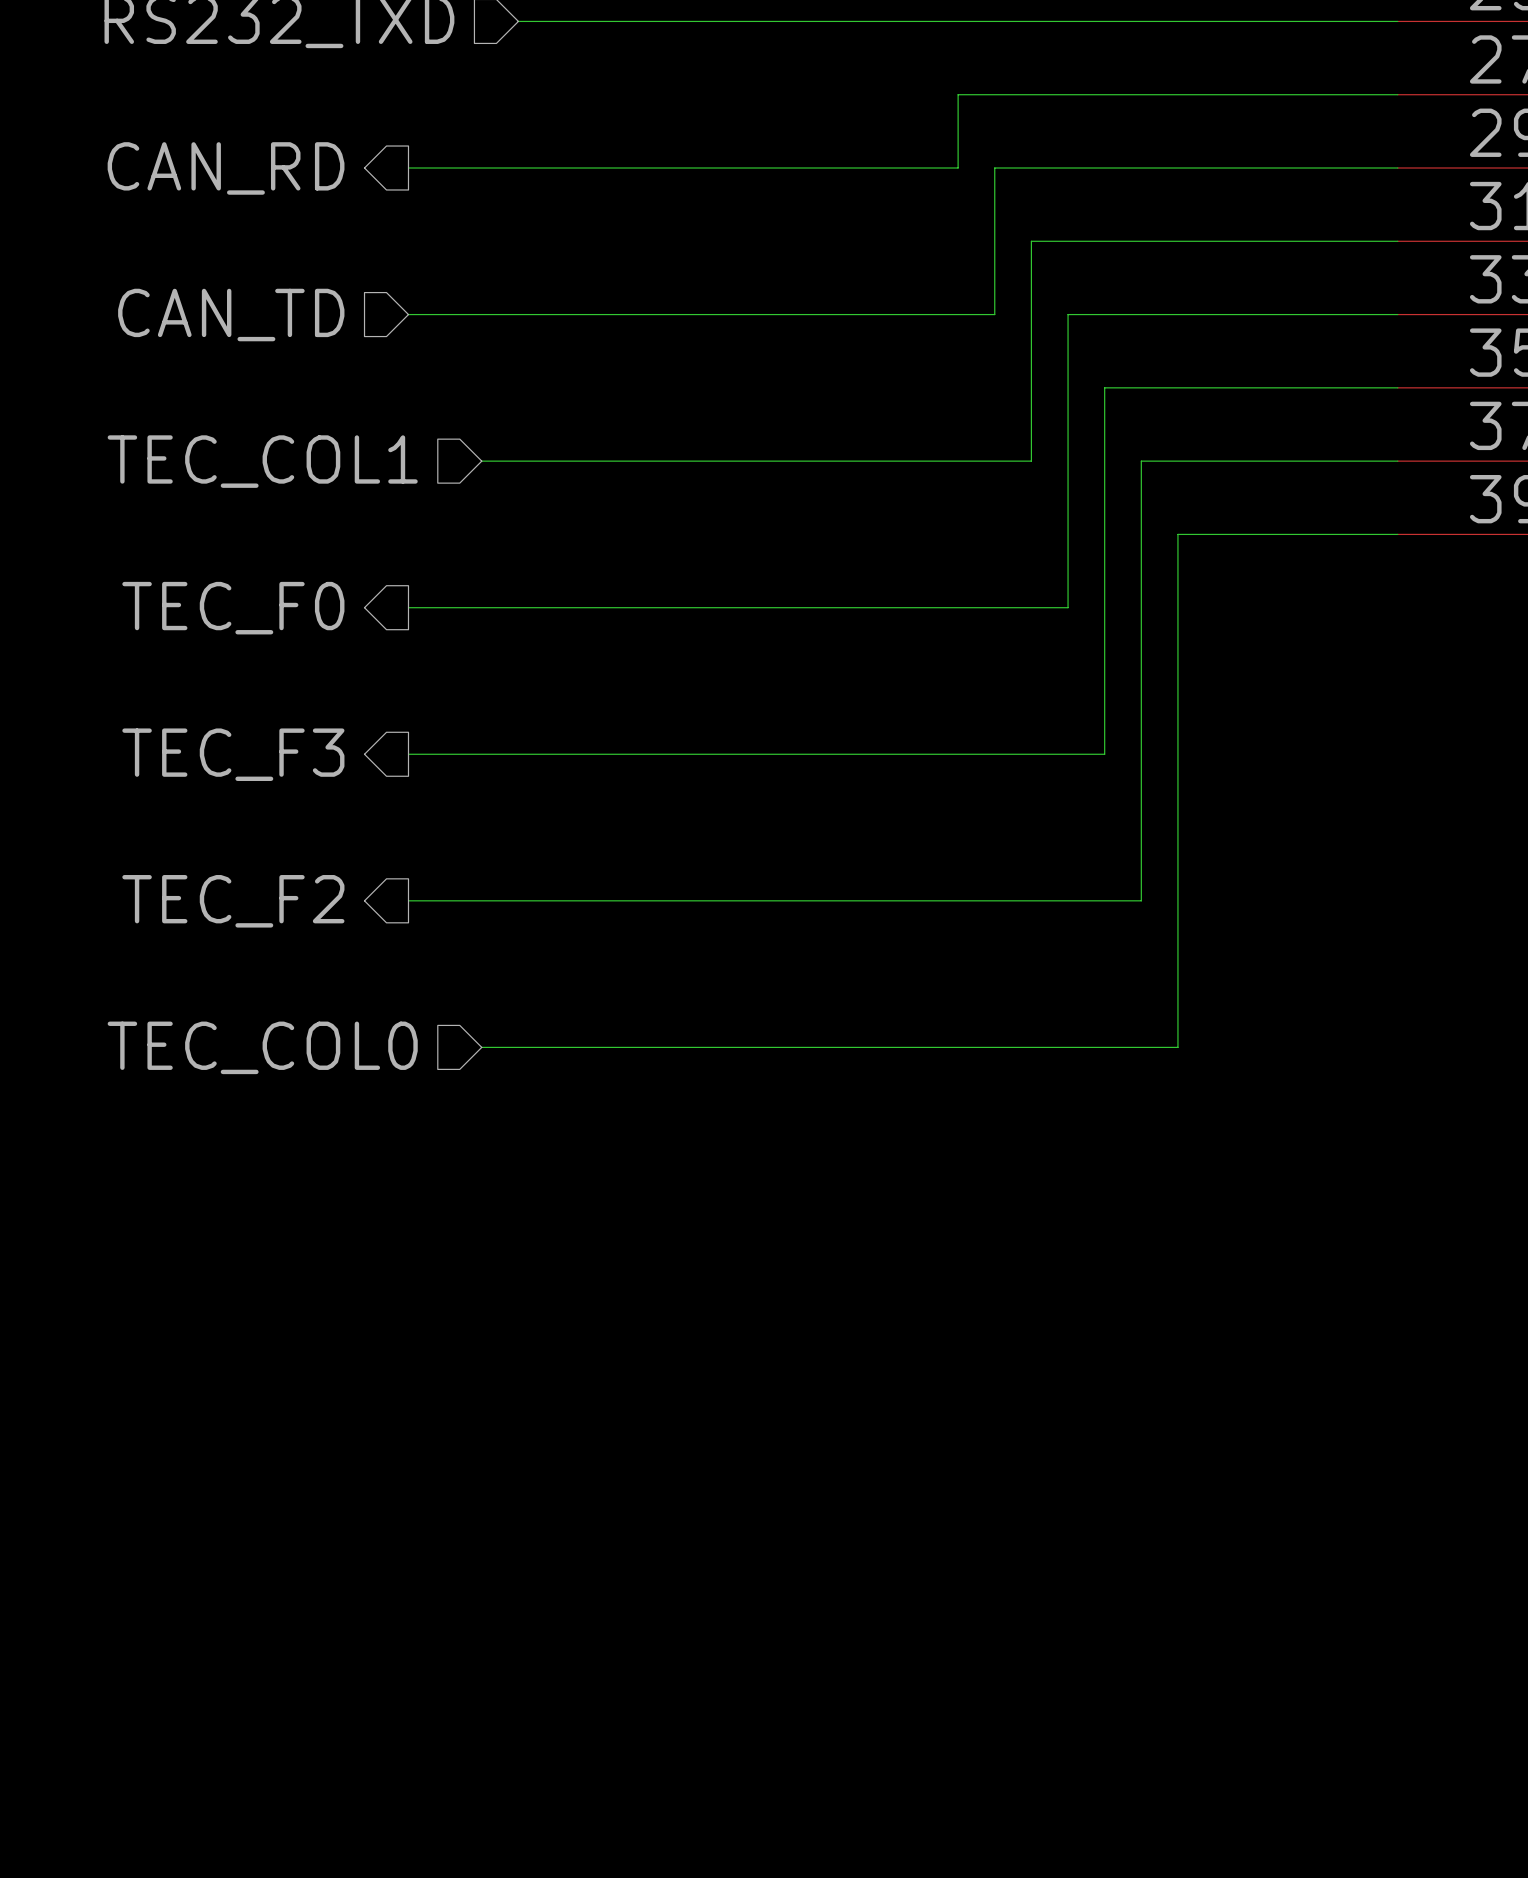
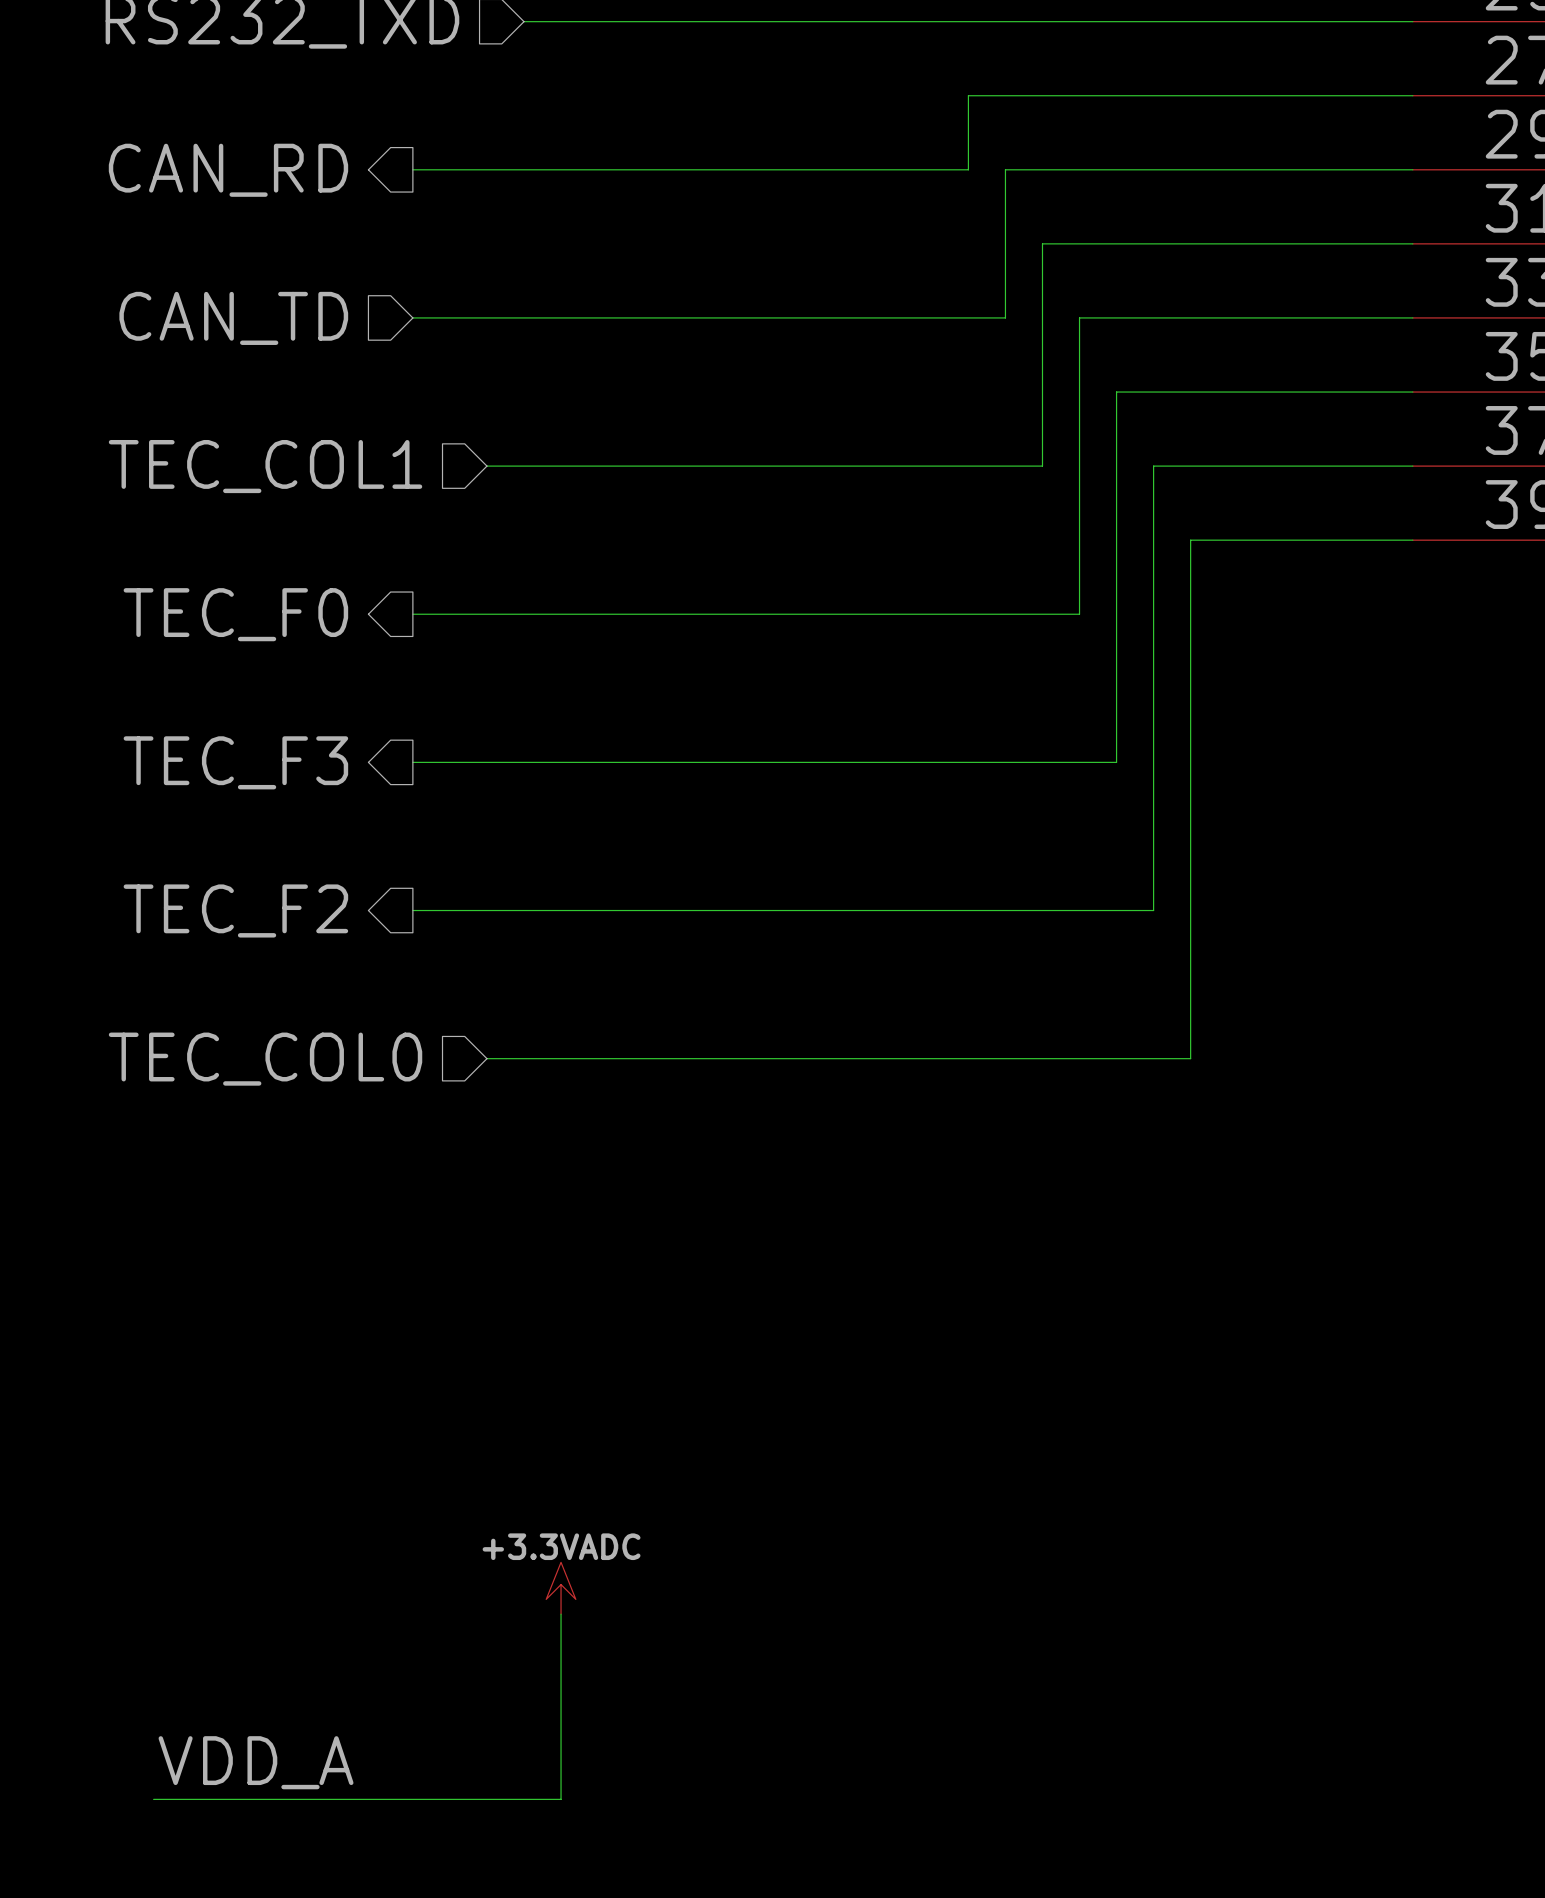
power symbol: none -> +3.3VADC (561, 1588)
wire: none -> (561, 1614) (561, 1799) (153, 1799)
label: none -> VDD_A (256, 1762)

